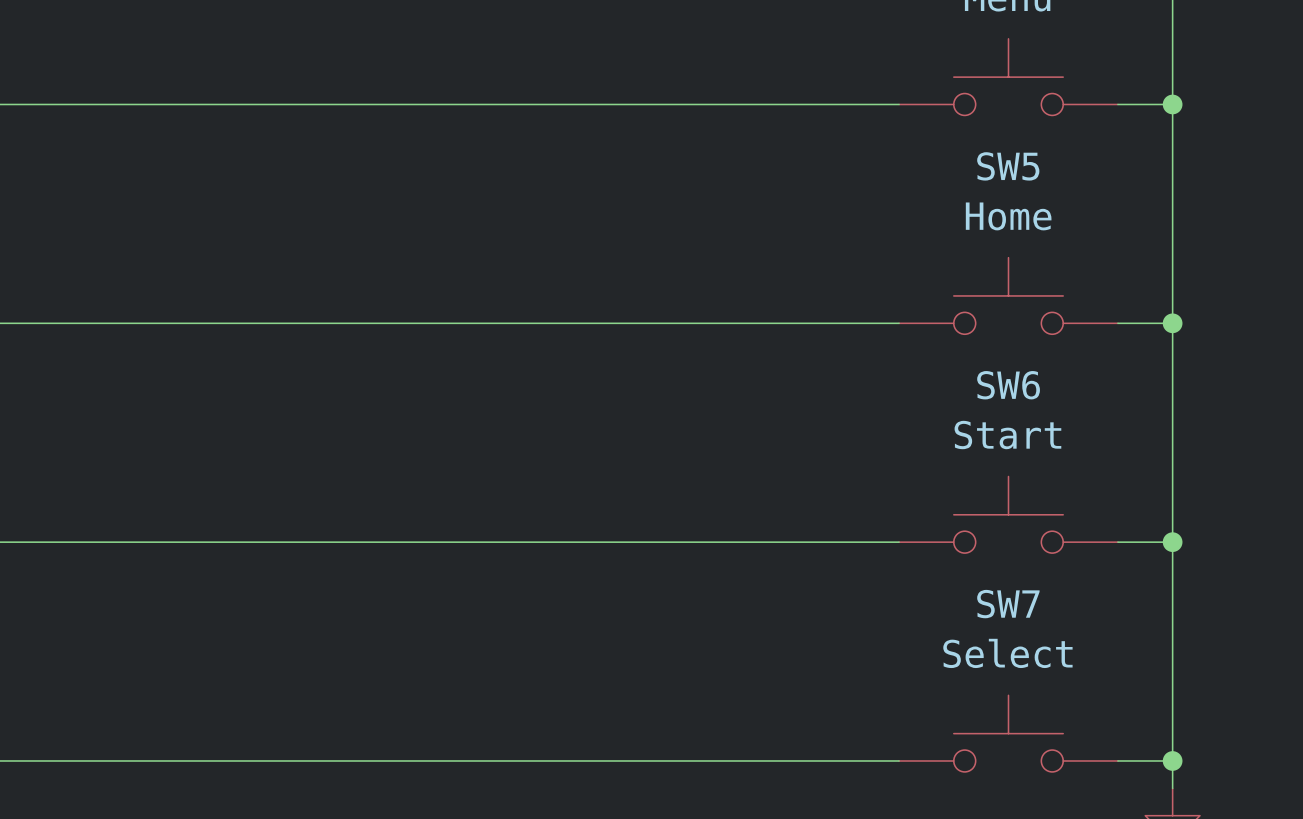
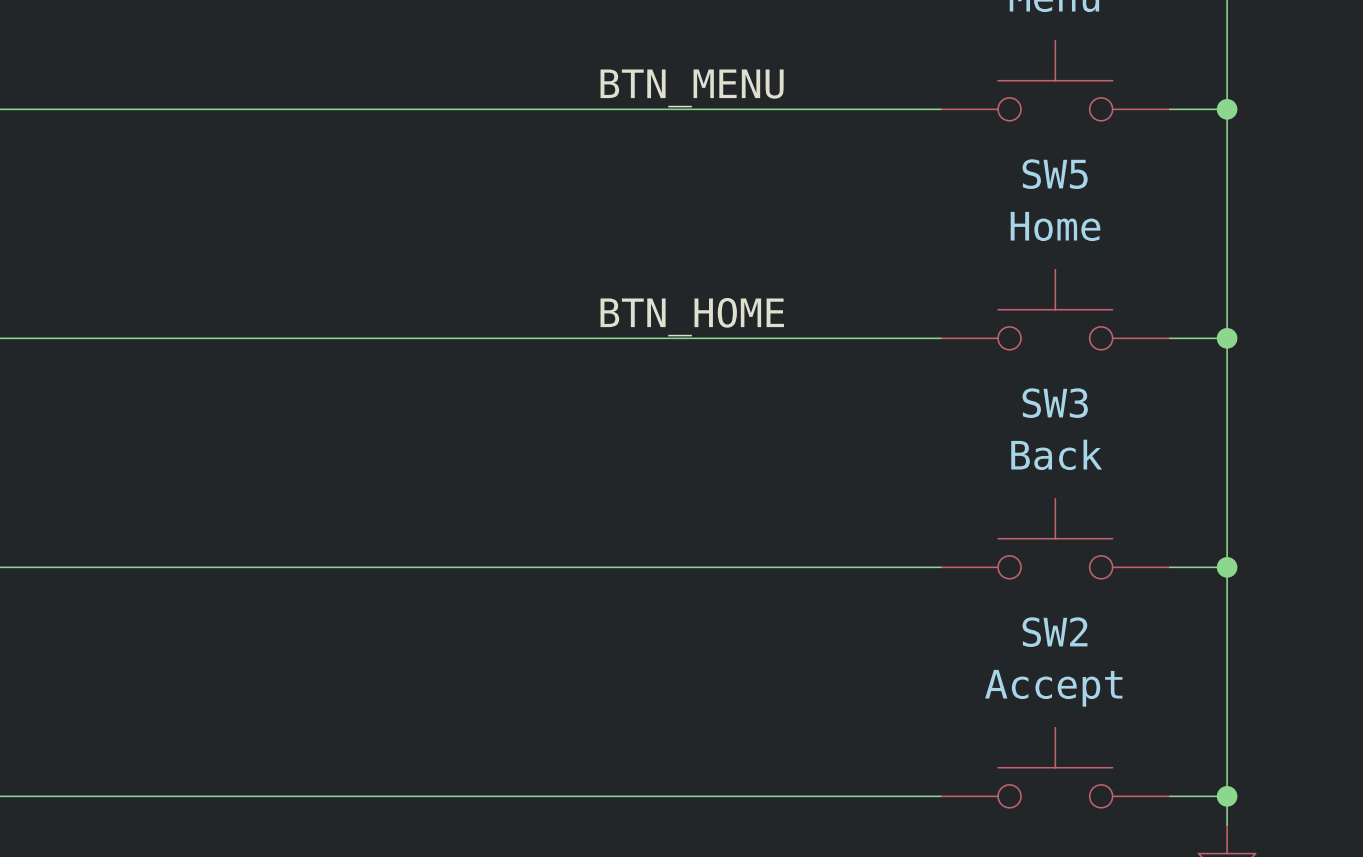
label: none -> BTN_MENU (692, 88)
label: none -> BTN_HOME (692, 317)
SW6 name: SW6 (1008, 385) -> SW3 (1055, 403)
SW6 value: Start (1007, 435) -> Back (1056, 454)
SW7 name: SW7 (1008, 604) -> SW2 (1055, 632)
SW7 value: Select (1007, 653) -> Accept (1053, 688)

